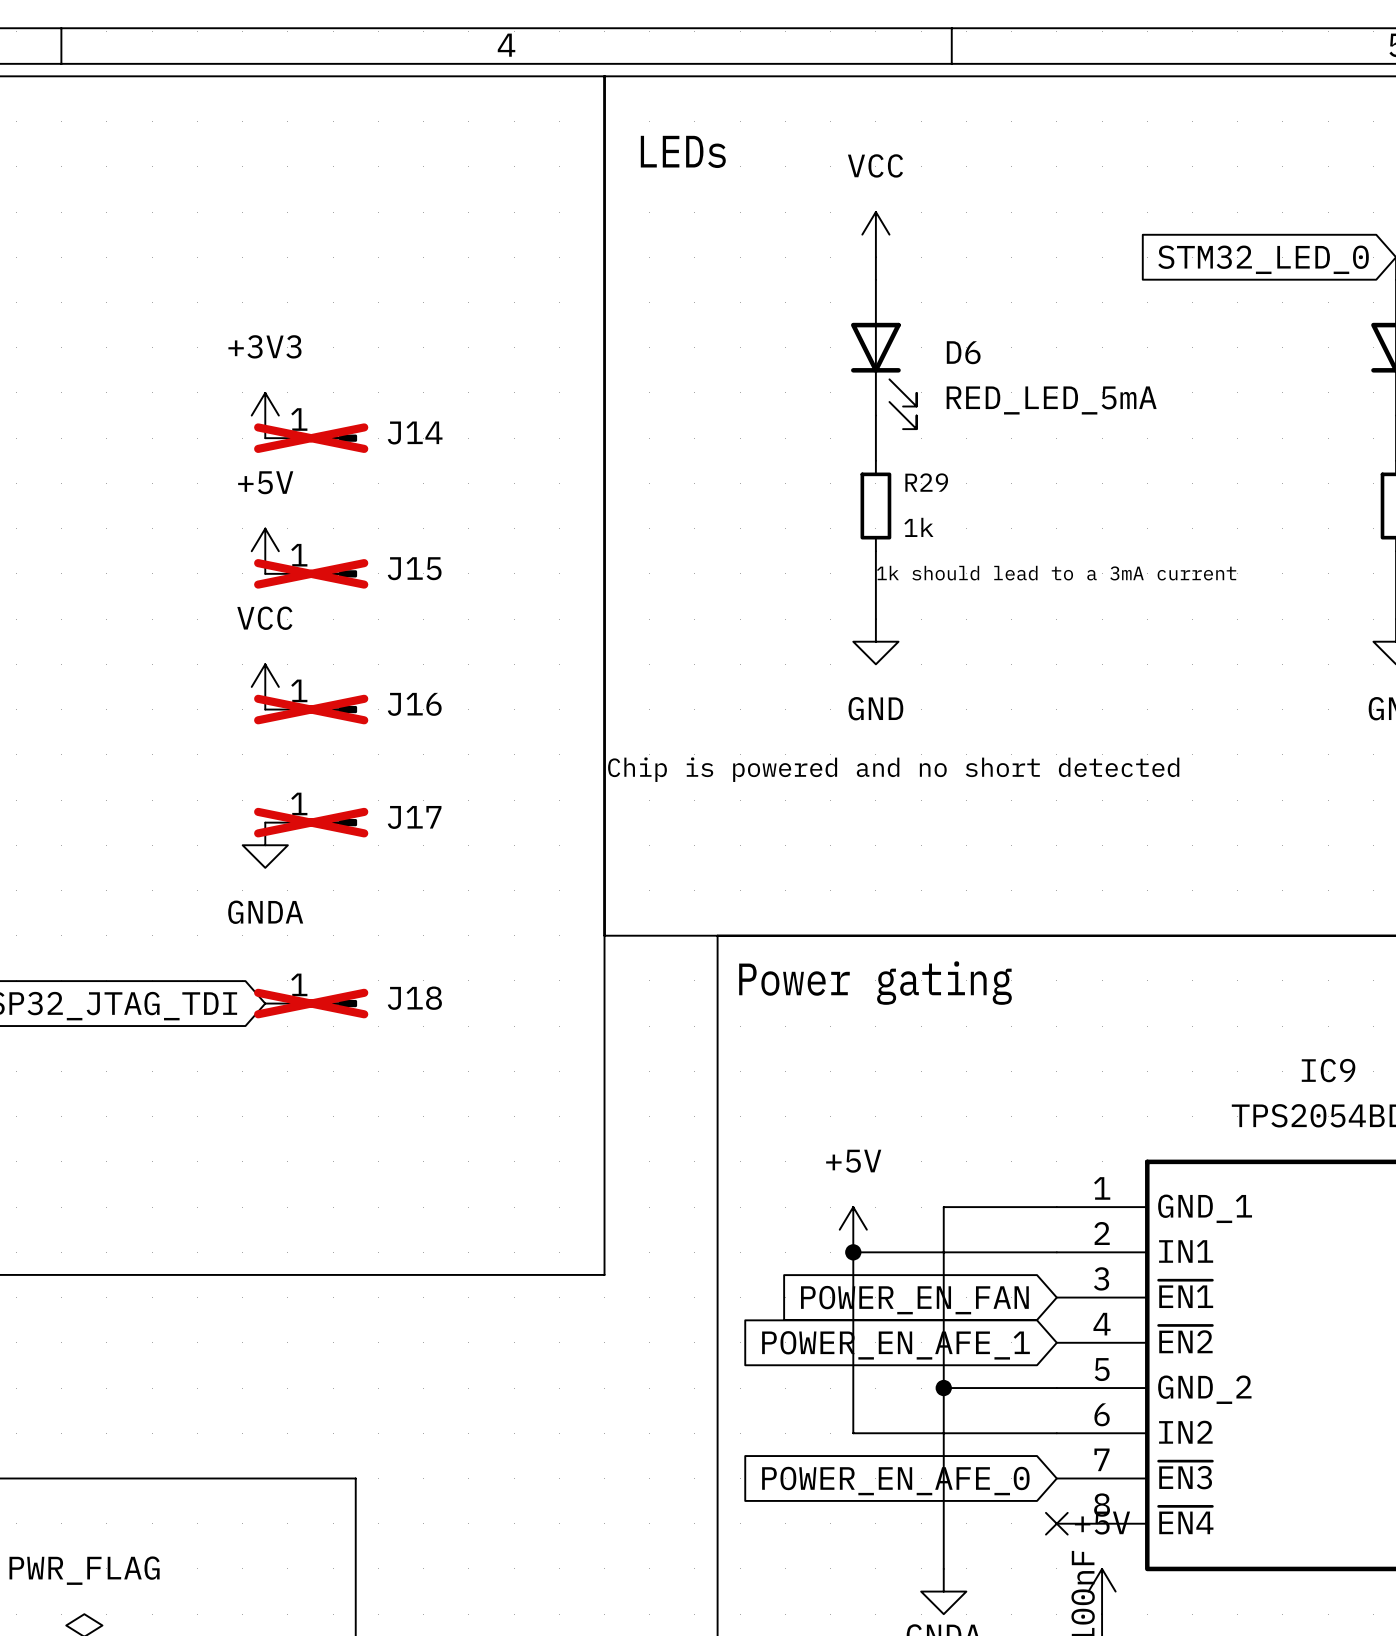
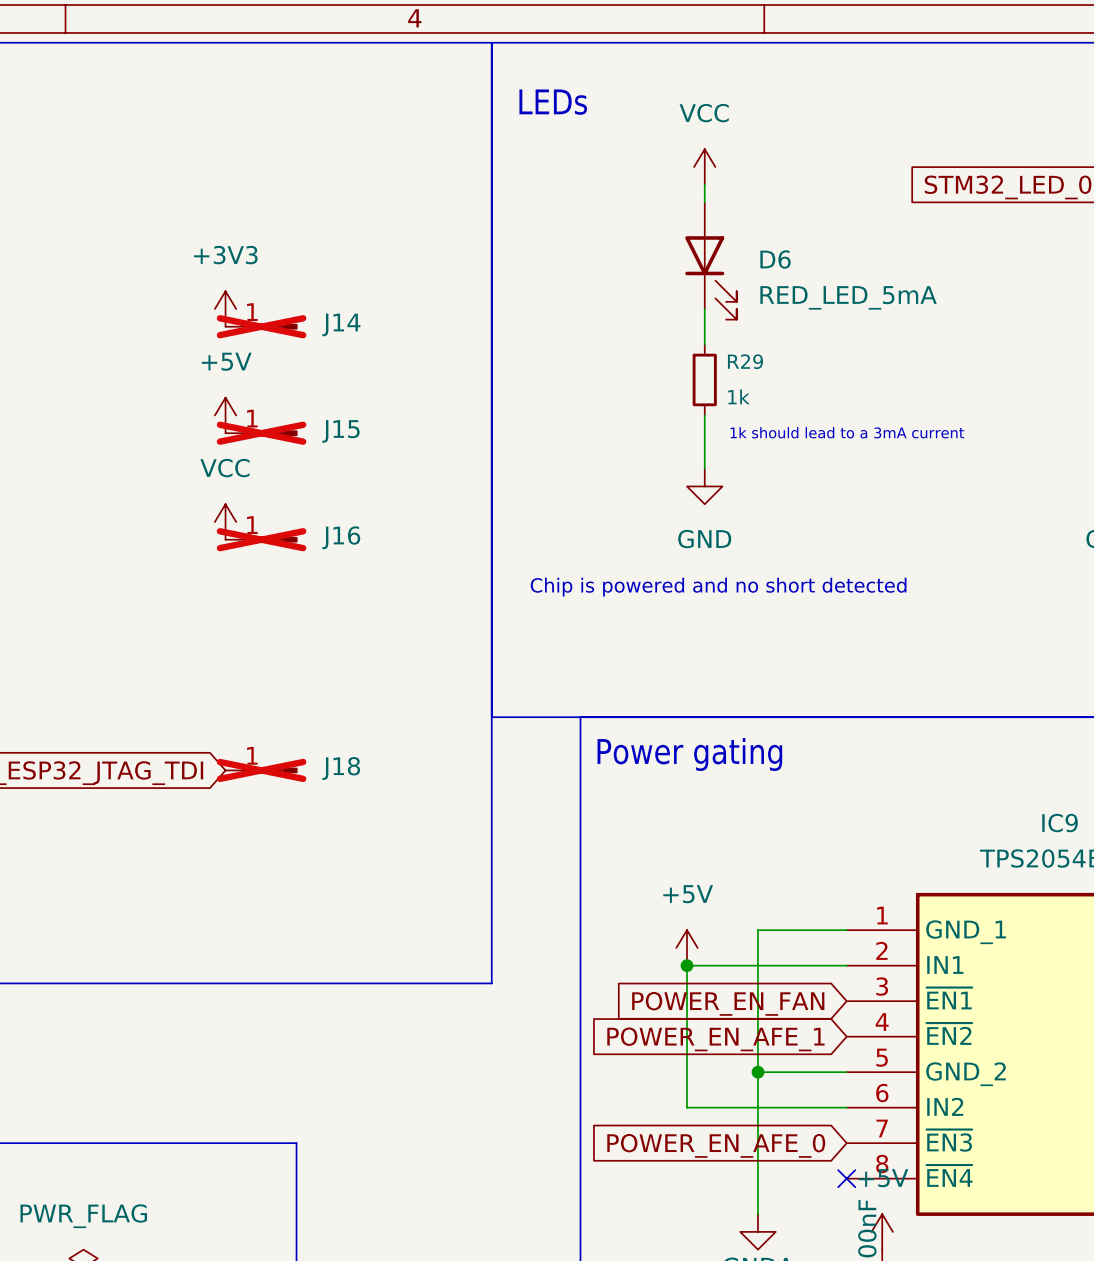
J17: (311, 822) -> none
power symbol: GNDA (265, 845) -> none

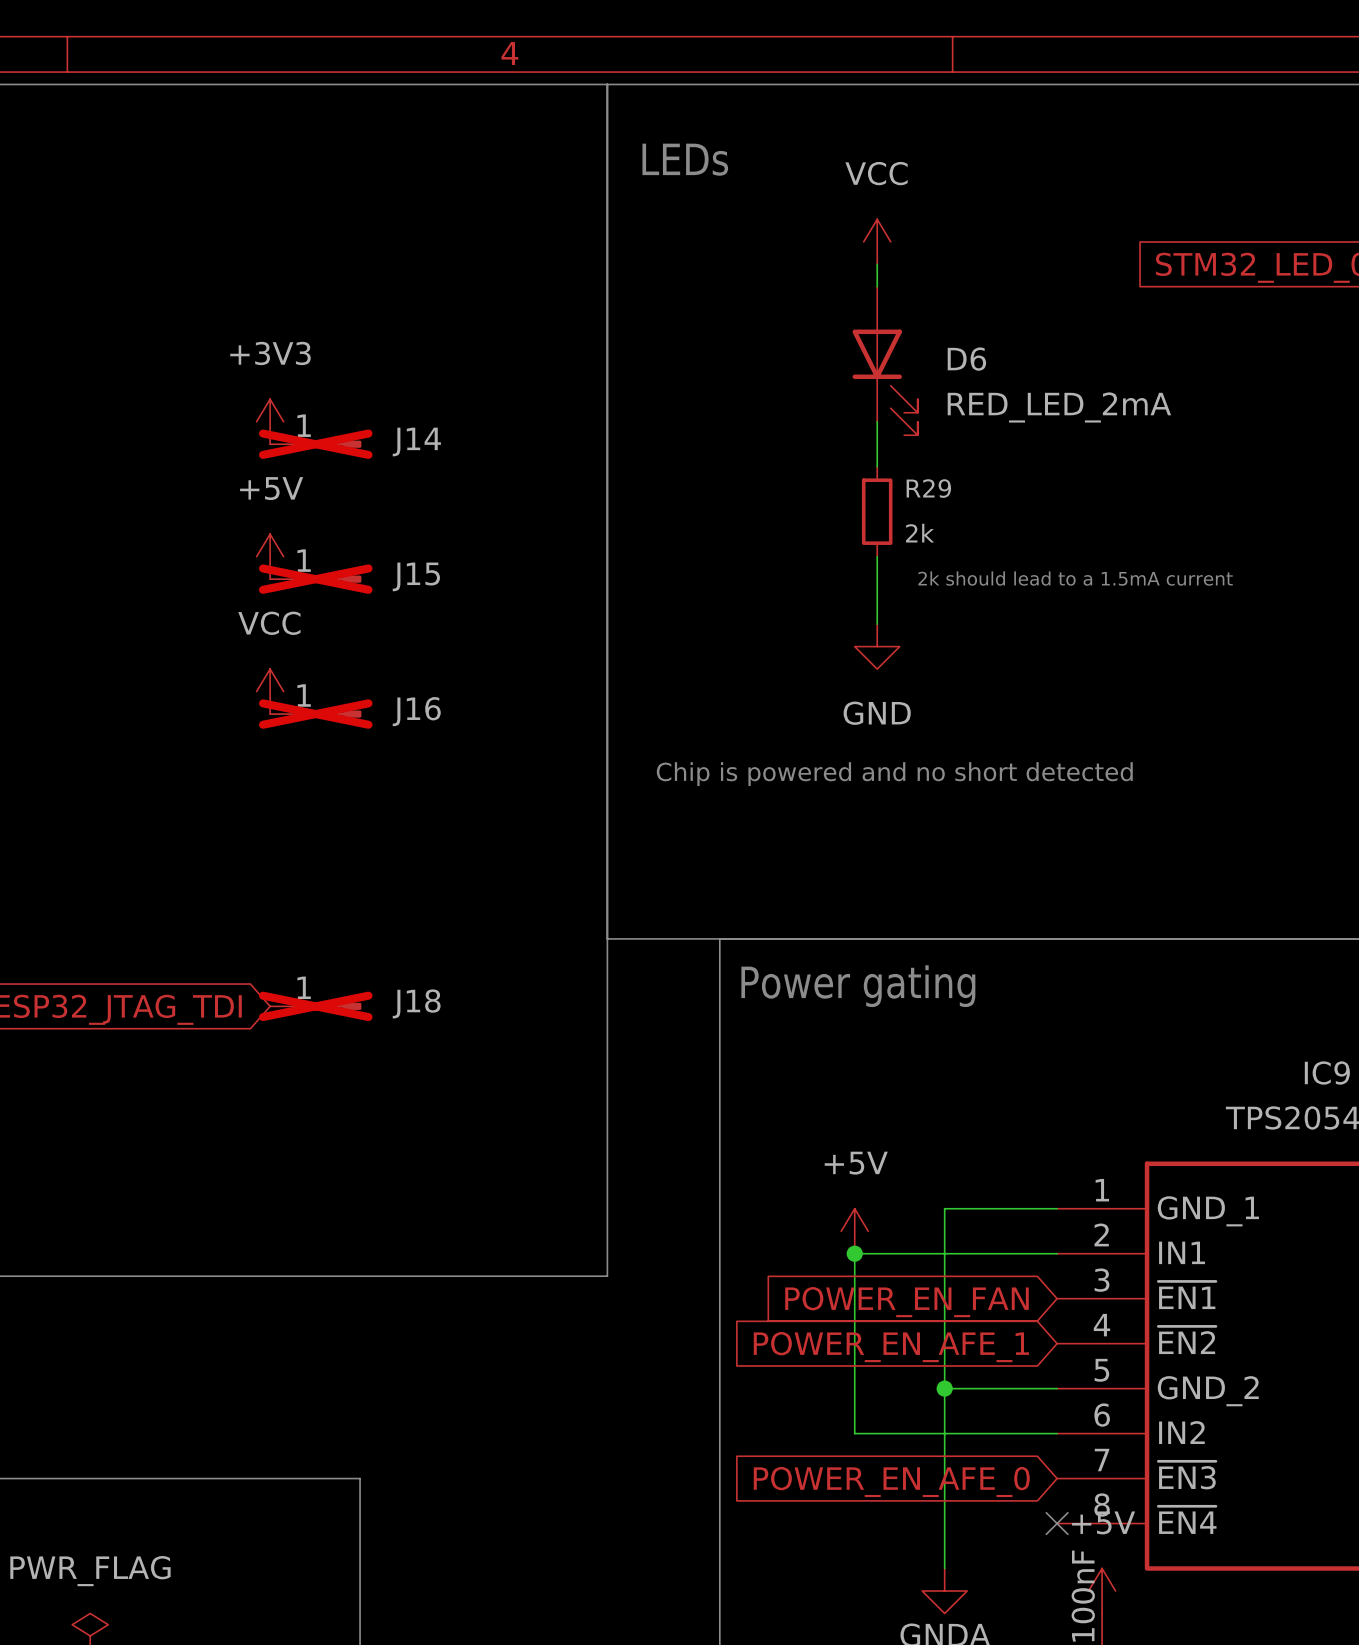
D6 value: RED_LED_5mA (848, 297) -> RED_LED_2mA (1059, 407)
R29 value: 1k (738, 396) -> 2k (920, 533)
text: 1k should lead to a 3mA current (847, 432) -> 2k should lead to a 1.5mA current (1075, 578)

